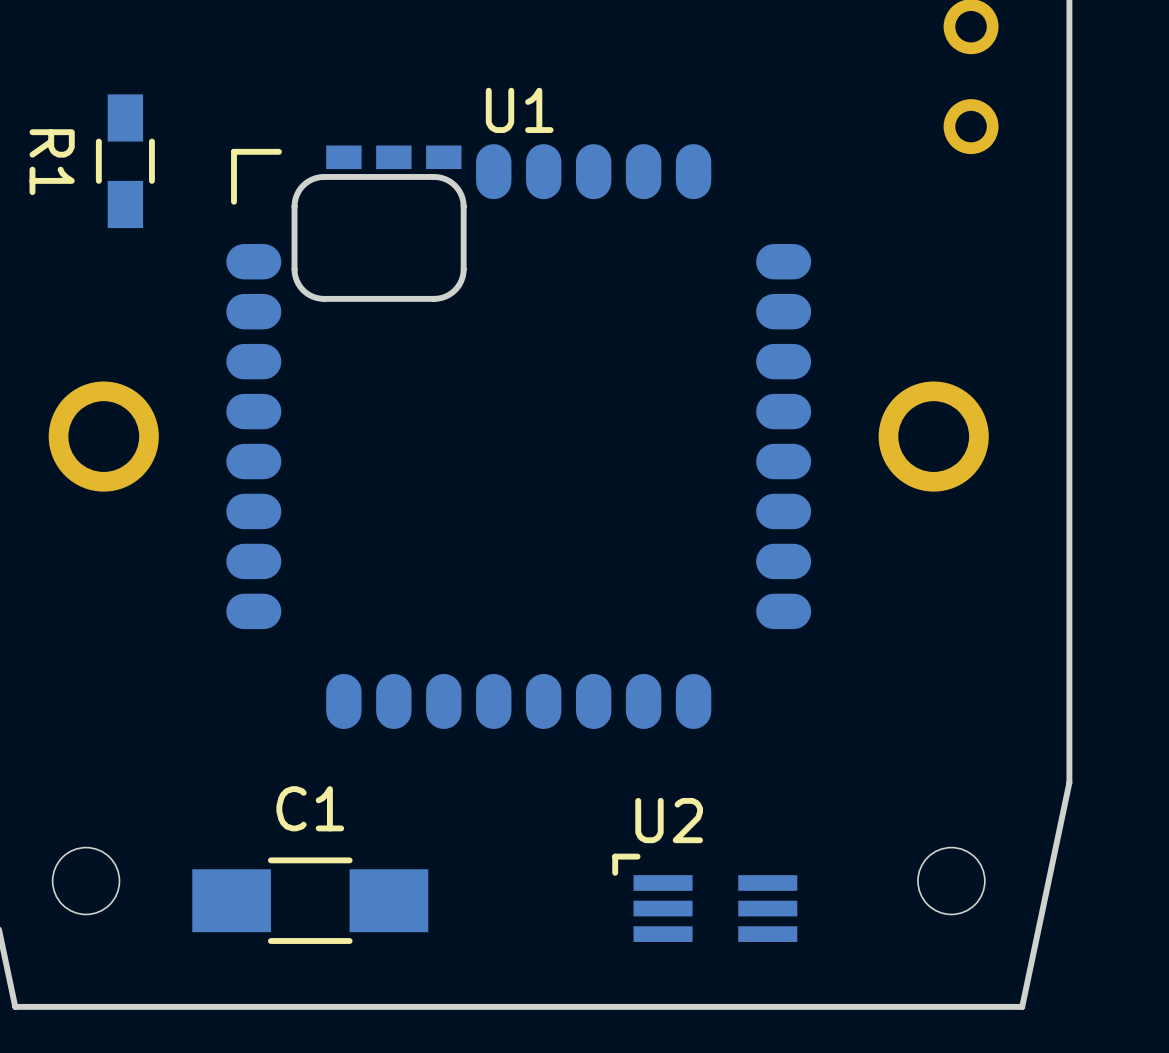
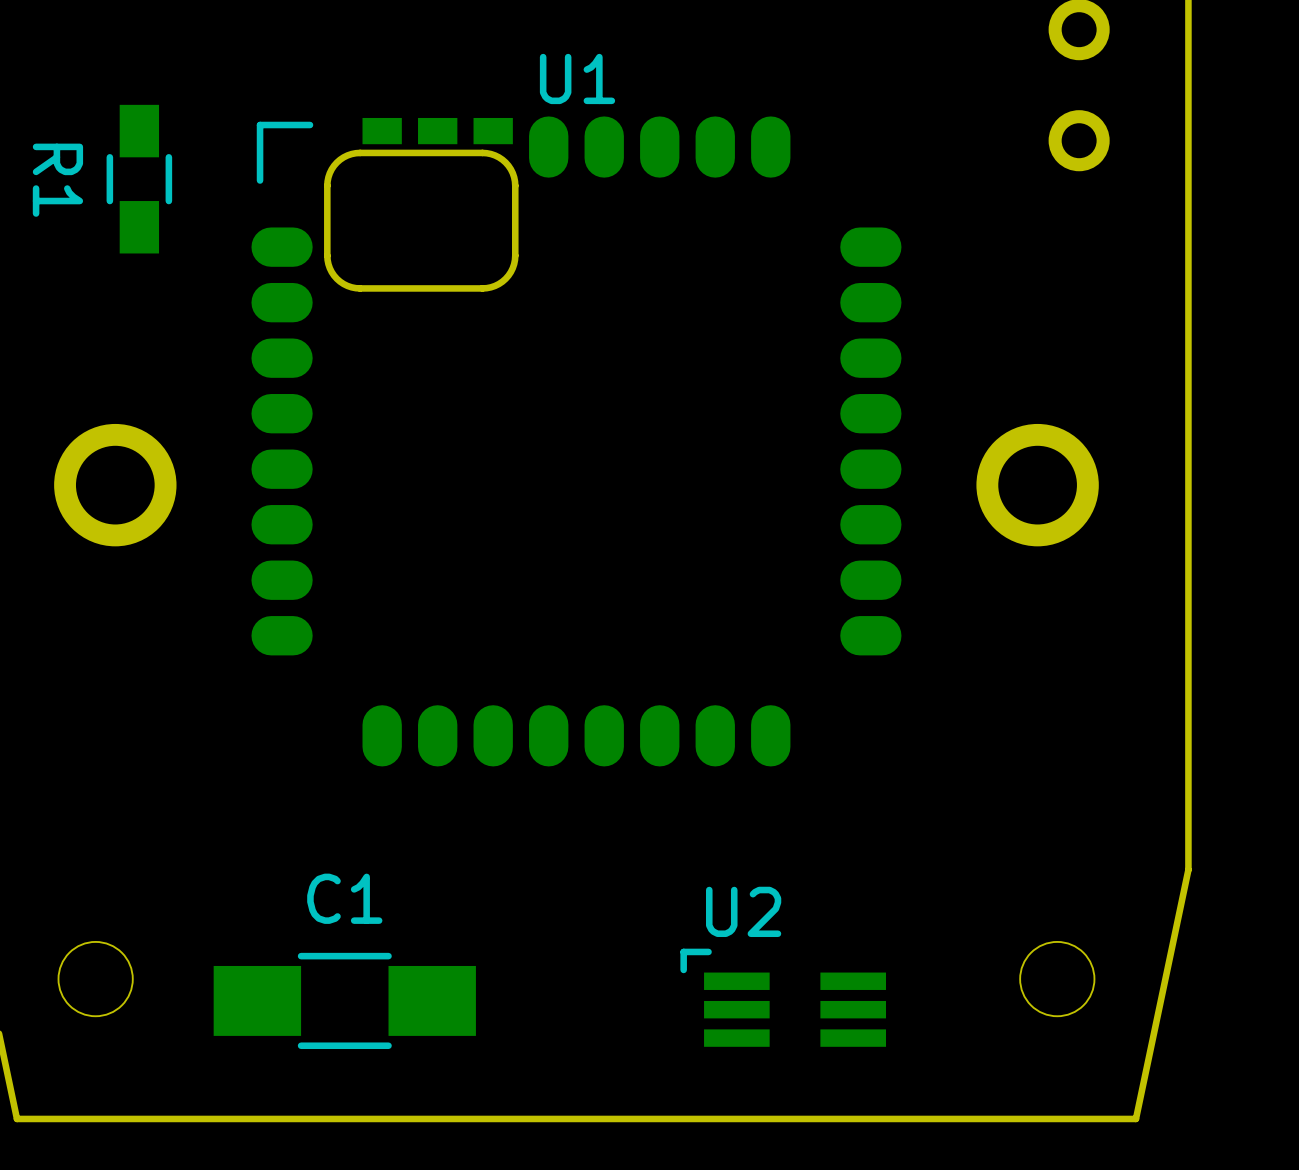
U1 position: (518, 436) -> (576, 441)

